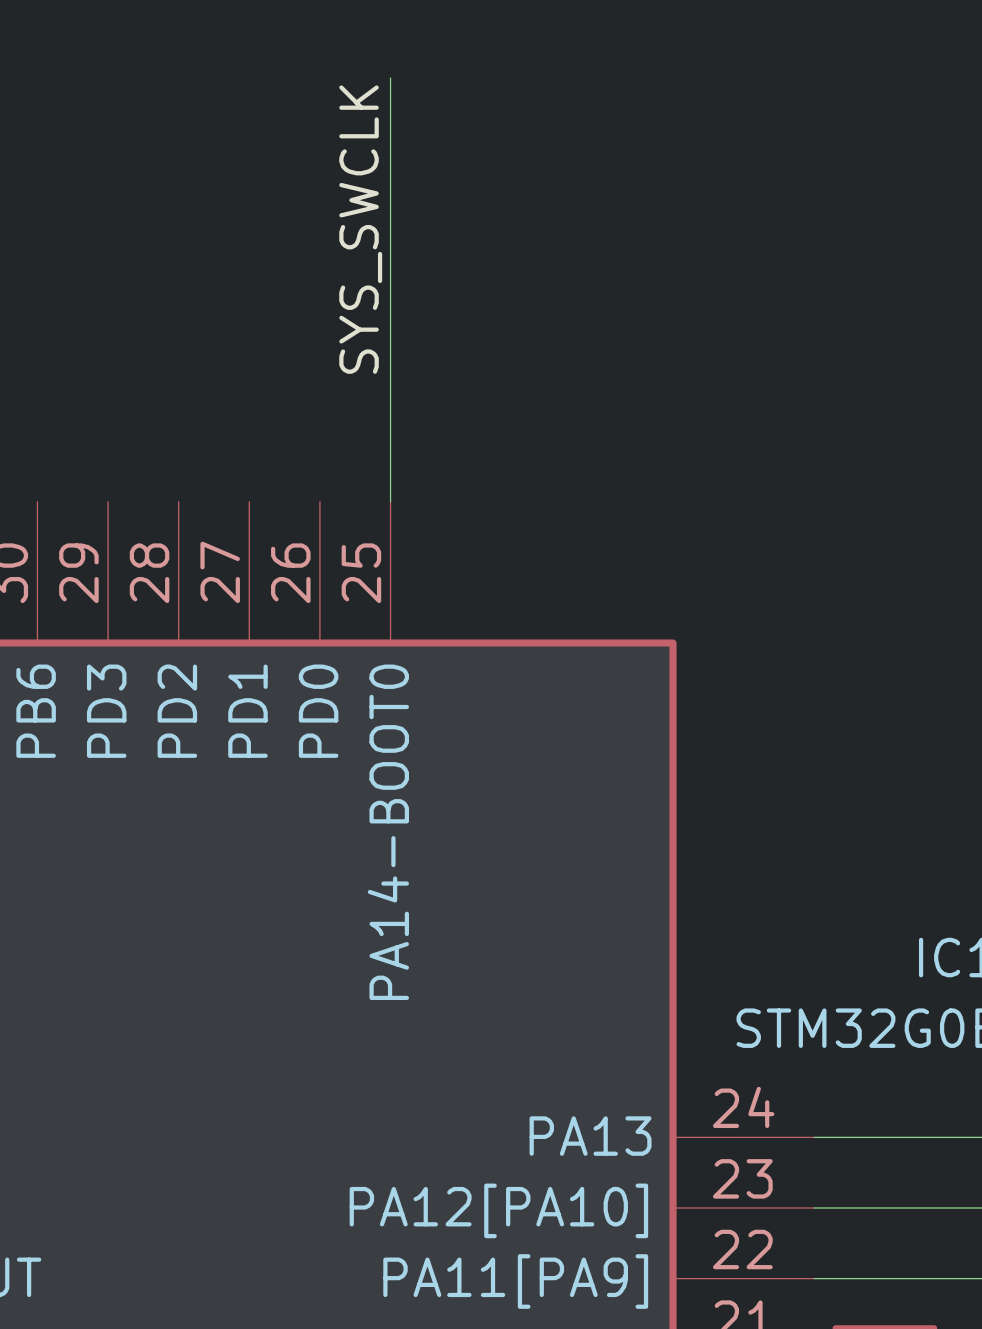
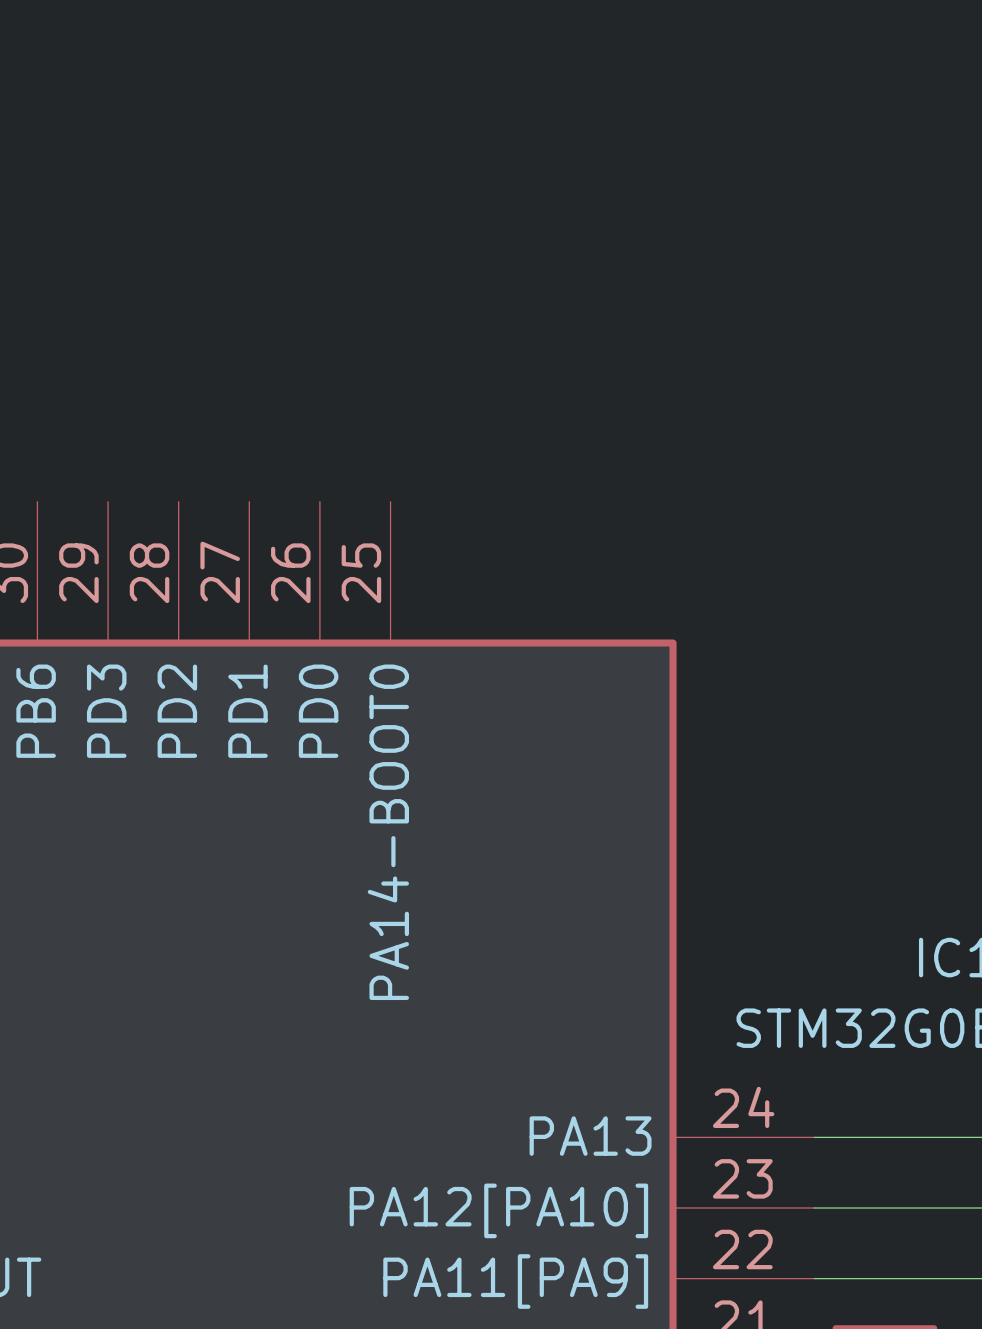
wire: (390, 78) (390, 501) -> none
label: SYS_SWCLK (360, 229) -> none

